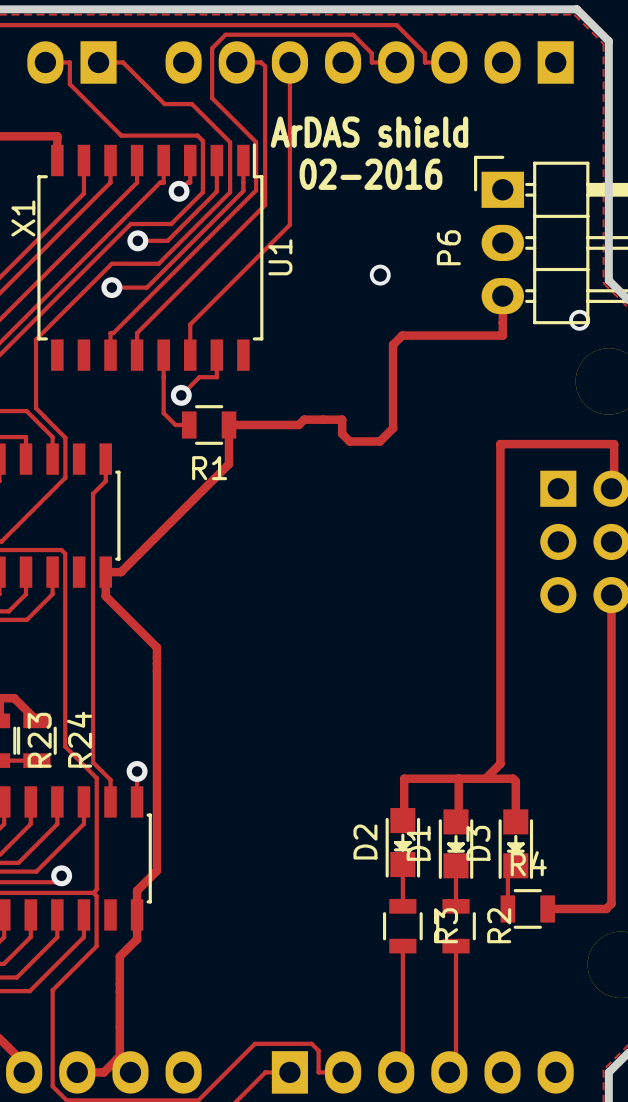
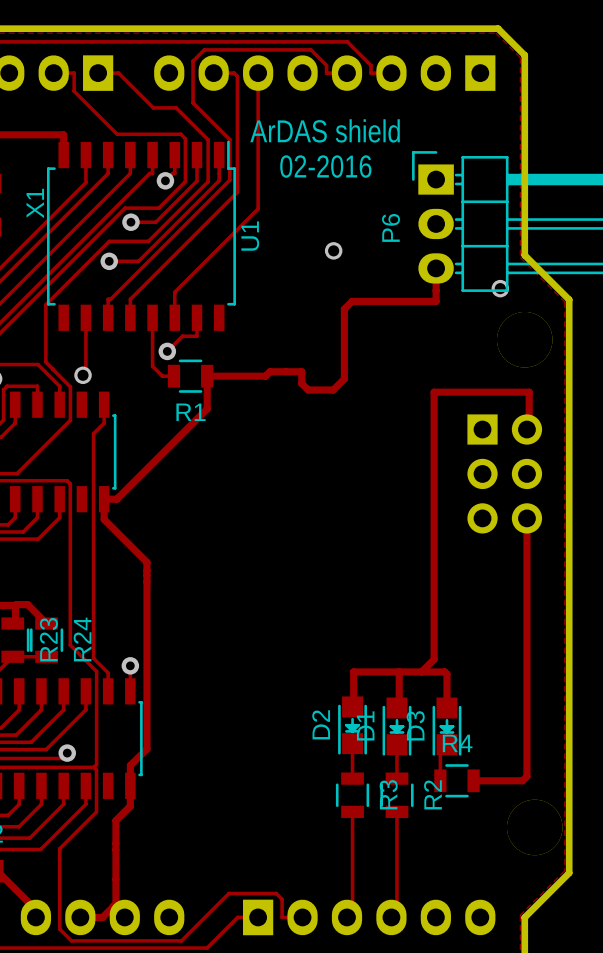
track: none -> (85, 317) (85, 372) (83, 375)
via: none -> (83, 375)

